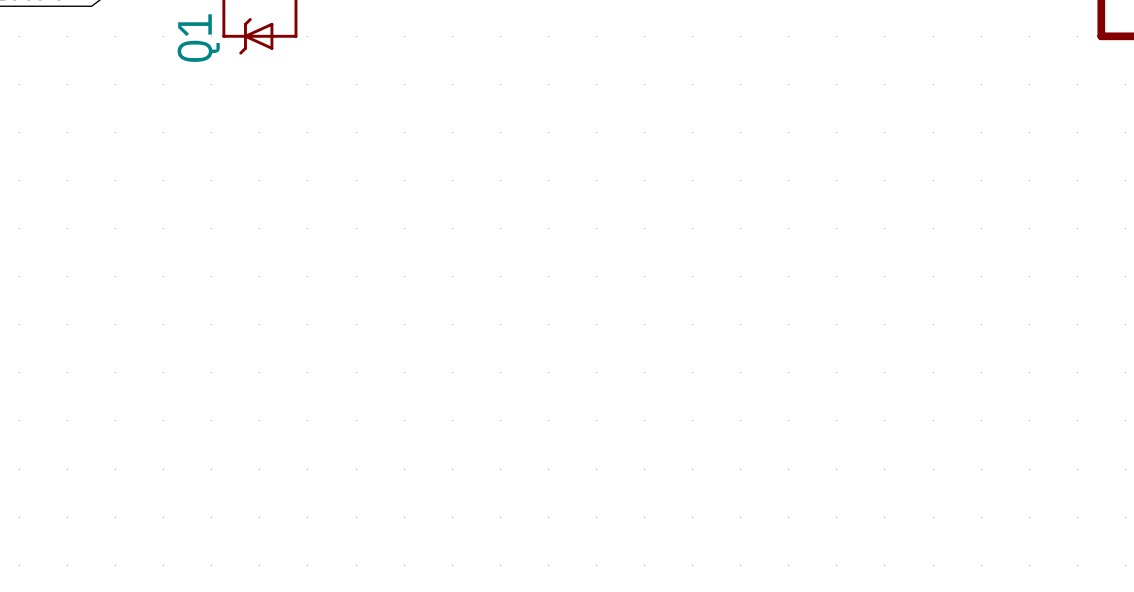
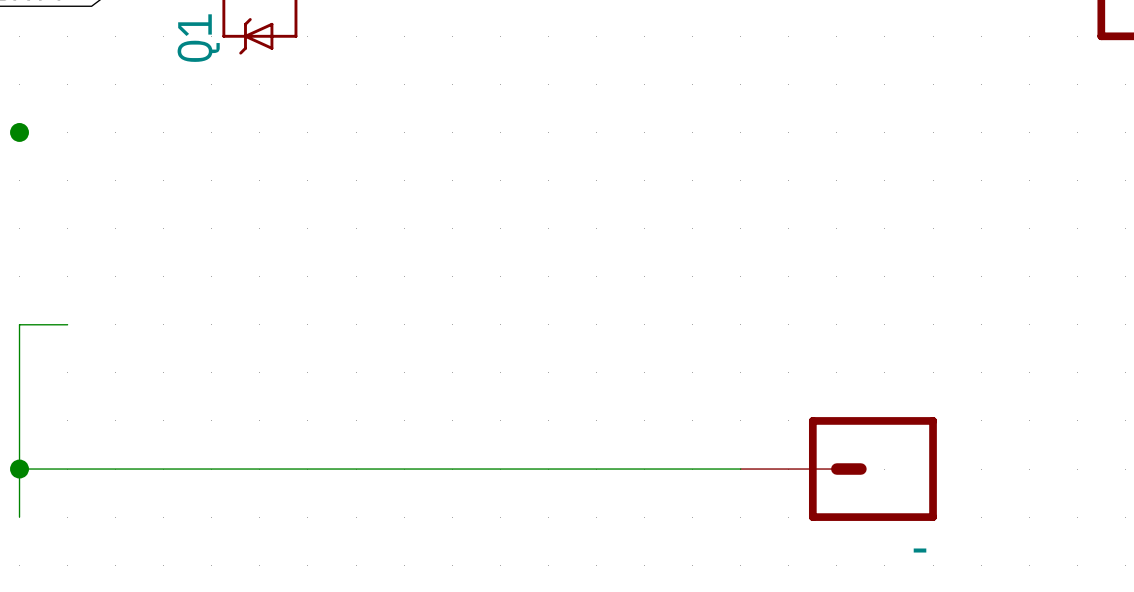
junction: none -> (19, 132)
wire: none -> (67, 324) (19, 324) (19, 517)
wire: none -> (19, 469) (740, 469)
junction: none -> (19, 469)
part: none -> (838, 469)

